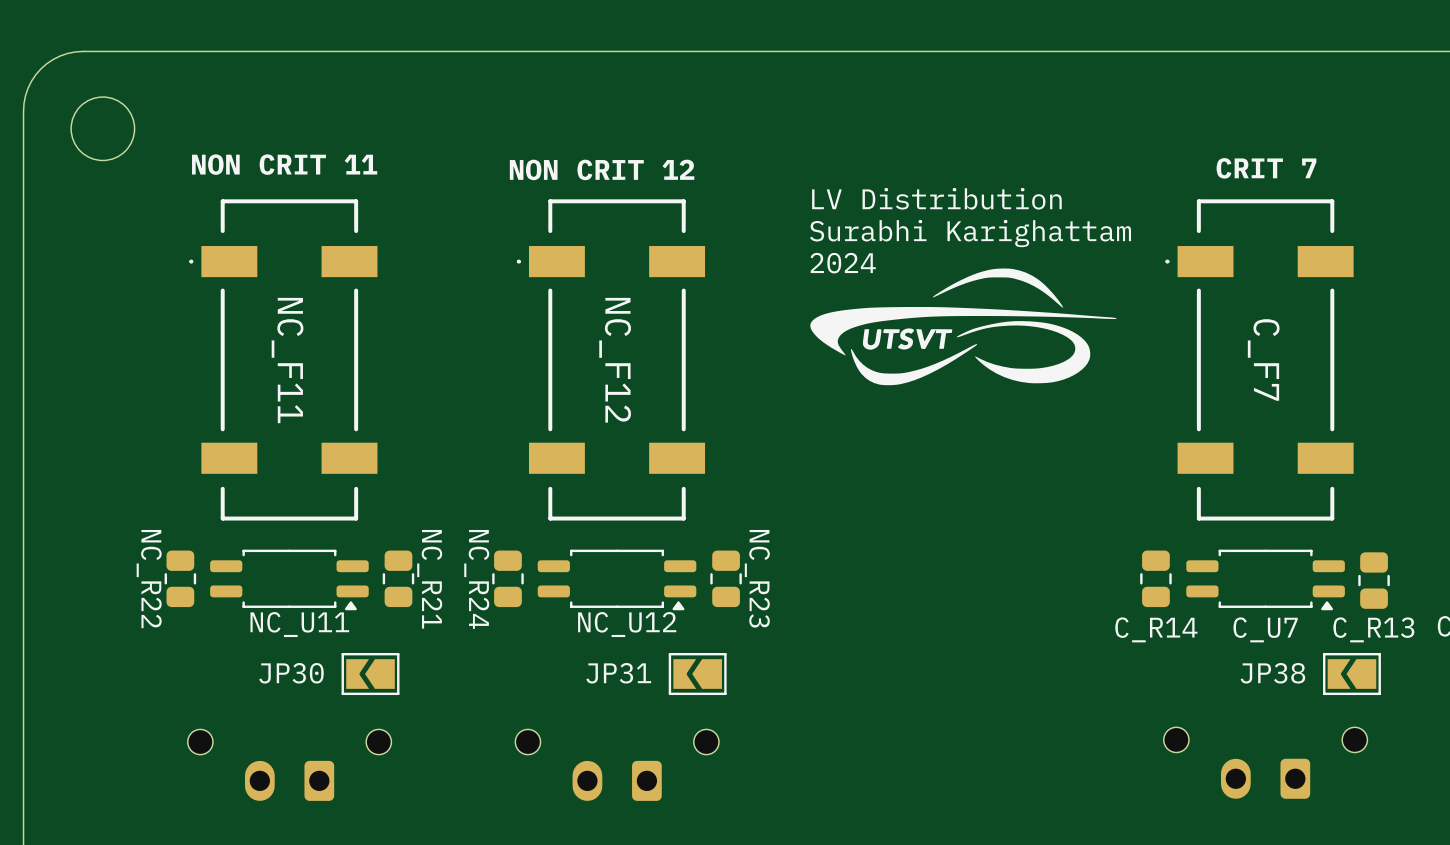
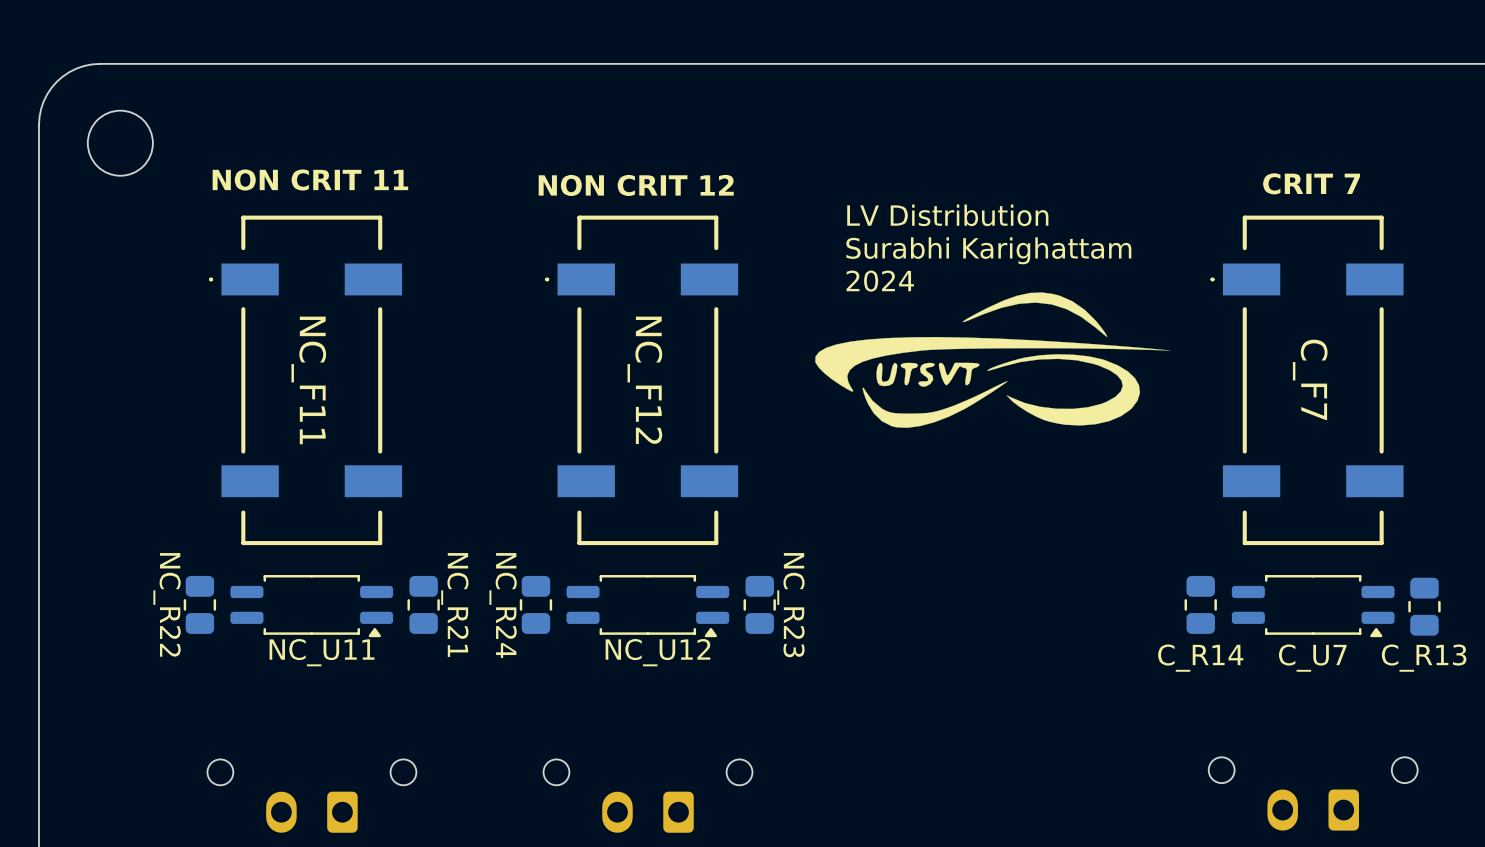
drawing shape: [810, 268, 1117, 386] -> [815, 292, 1171, 428]
JP30: (370, 674) -> none
JP31: (697, 674) -> none
JP38: (1351, 674) -> none

